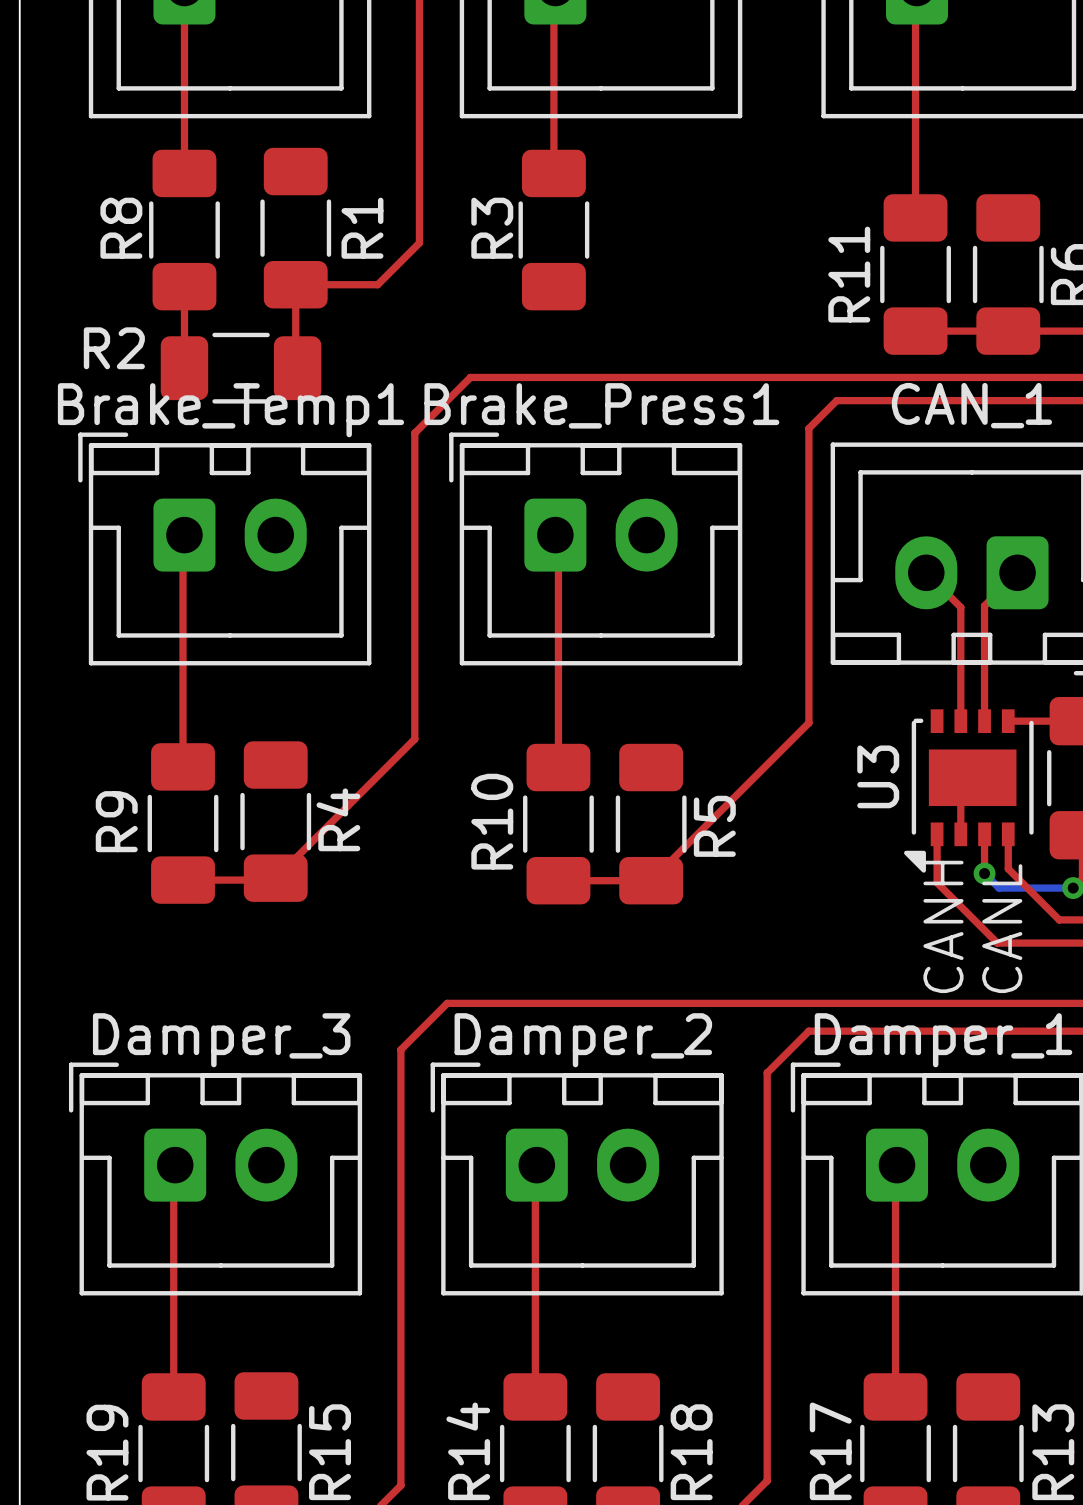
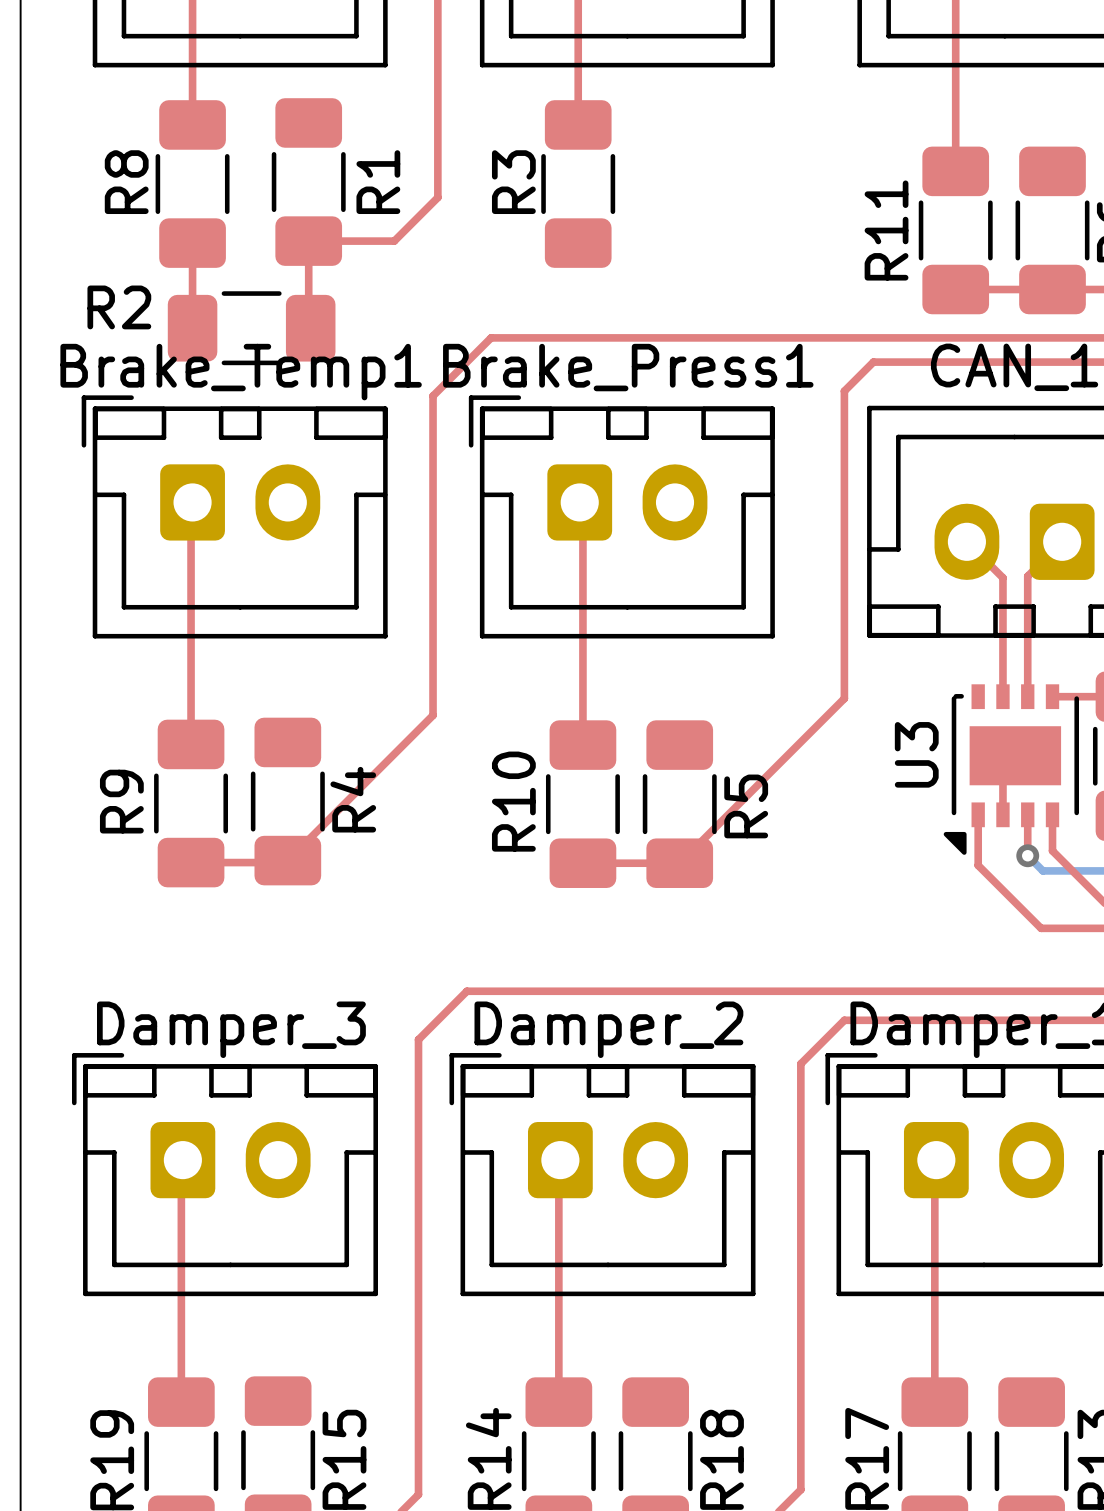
text: CANH (943, 926) -> none
text: CANL (1002, 928) -> none

